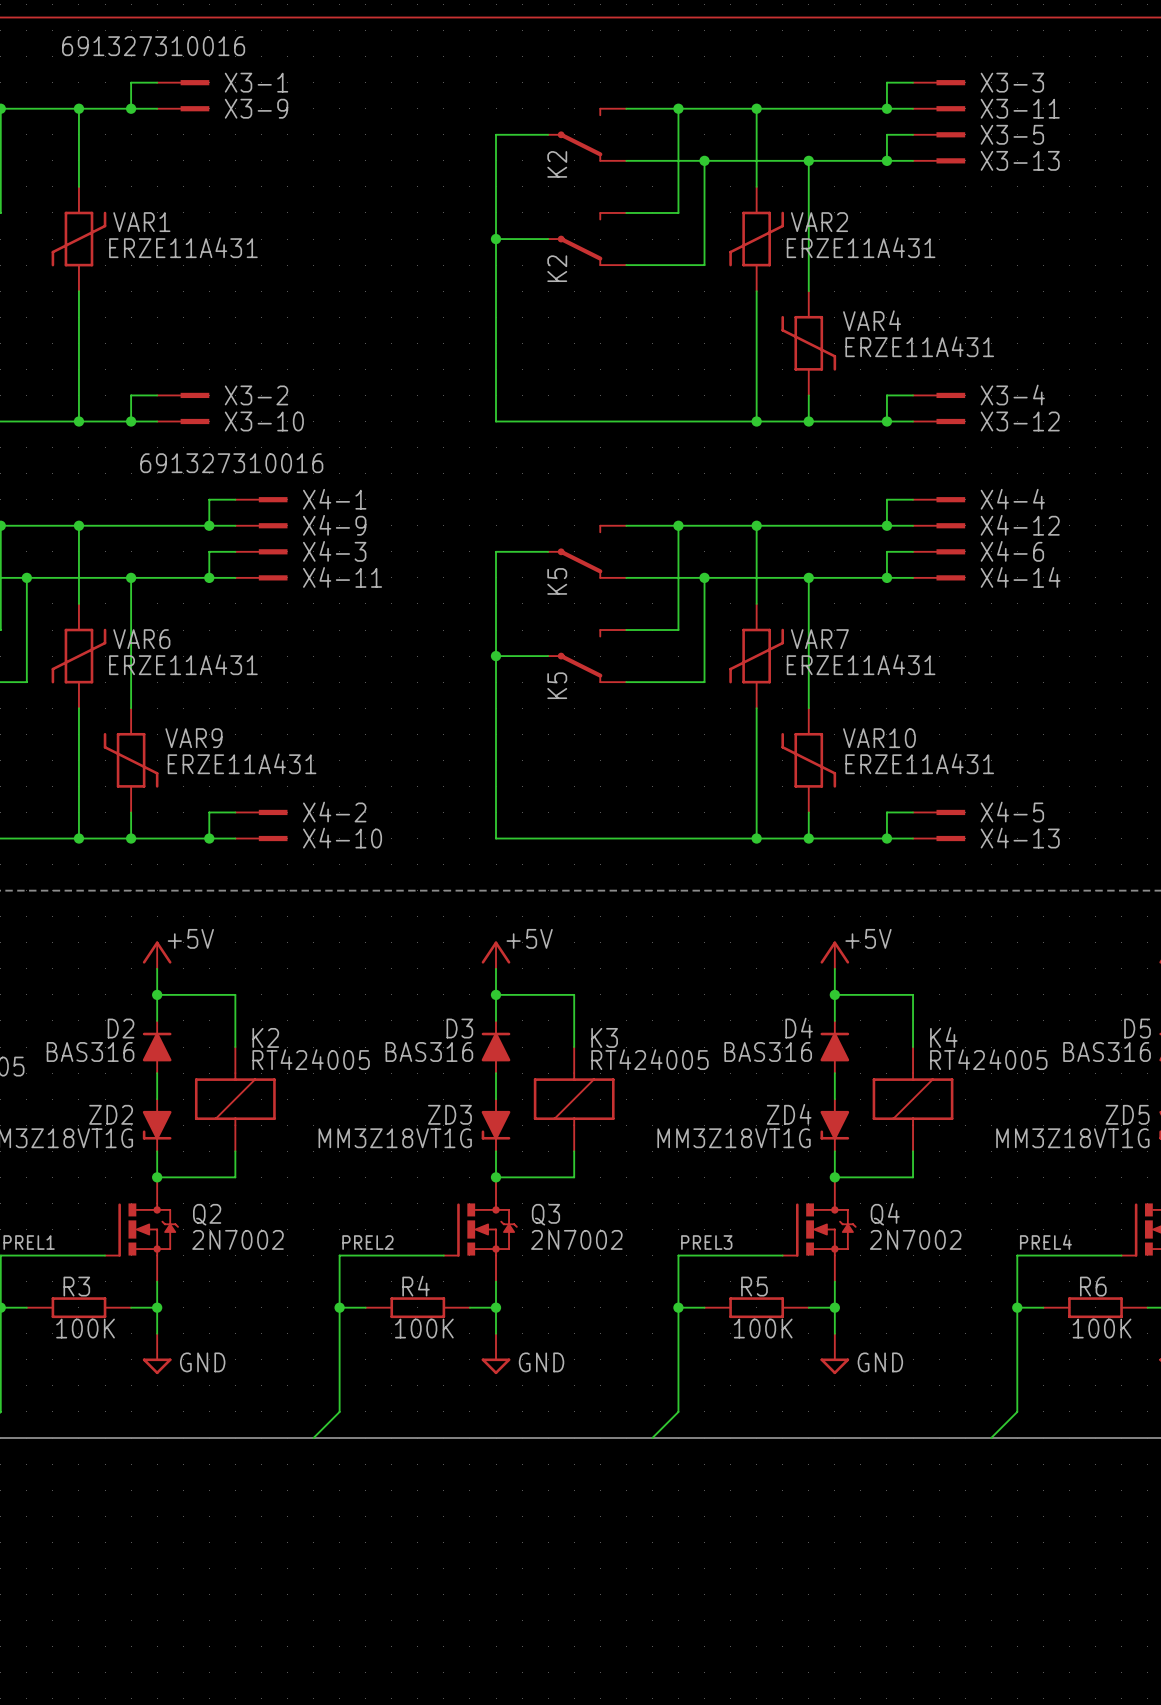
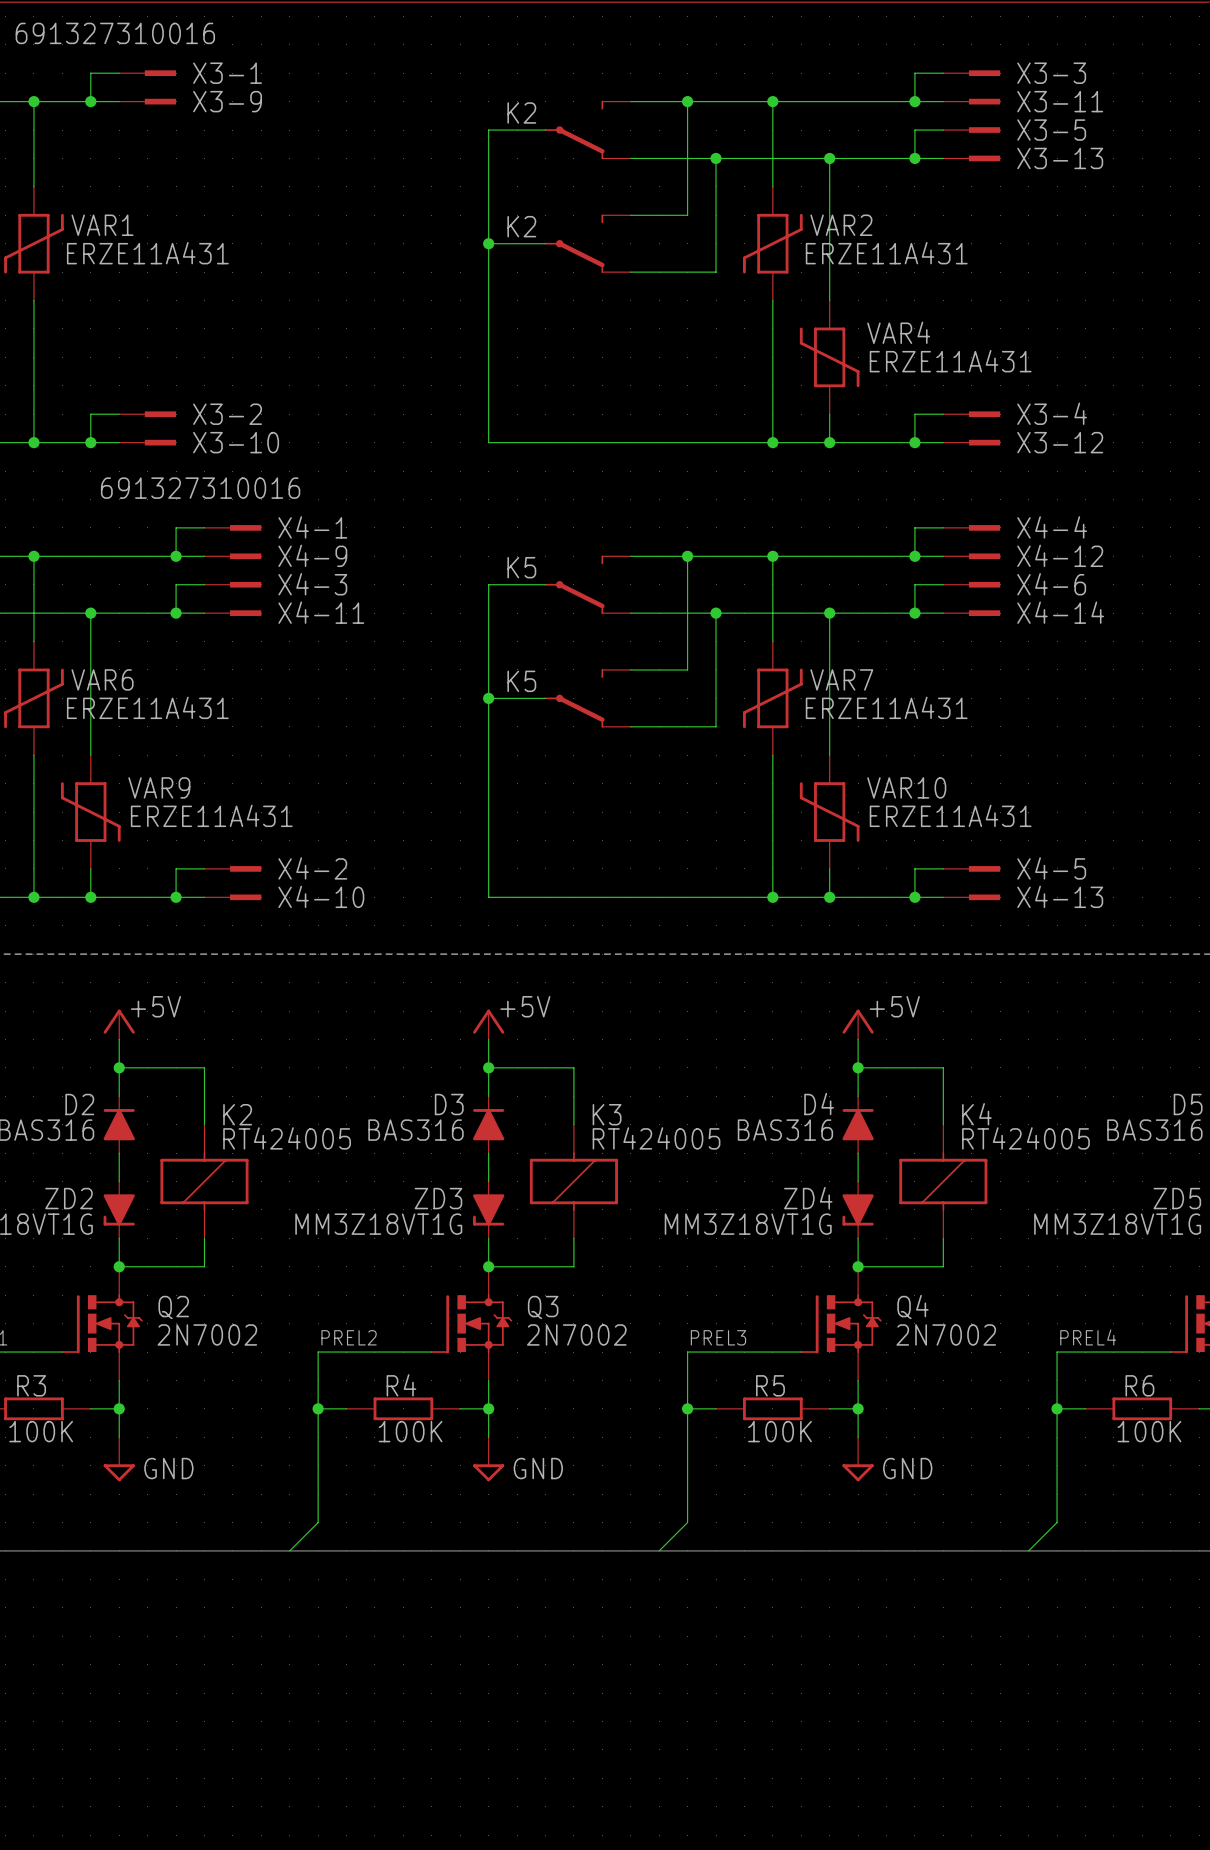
K2 name rotation: 0° (557, 164) -> 90° clockwise (521, 112)
K2 name position: K2 (557, 164) -> K2 (521, 112)
K2 name rotation: 0° (557, 268) -> 90° clockwise (521, 226)
K2 name position: K2 (557, 268) -> K2 (521, 226)
K5 name rotation: 0° (557, 581) -> 90° clockwise (521, 567)
K5 name position: K5 (557, 581) -> K5 (521, 567)
K5 name rotation: 0° (557, 685) -> 90° clockwise (521, 681)
K5 name position: K5 (557, 685) -> K5 (521, 681)

